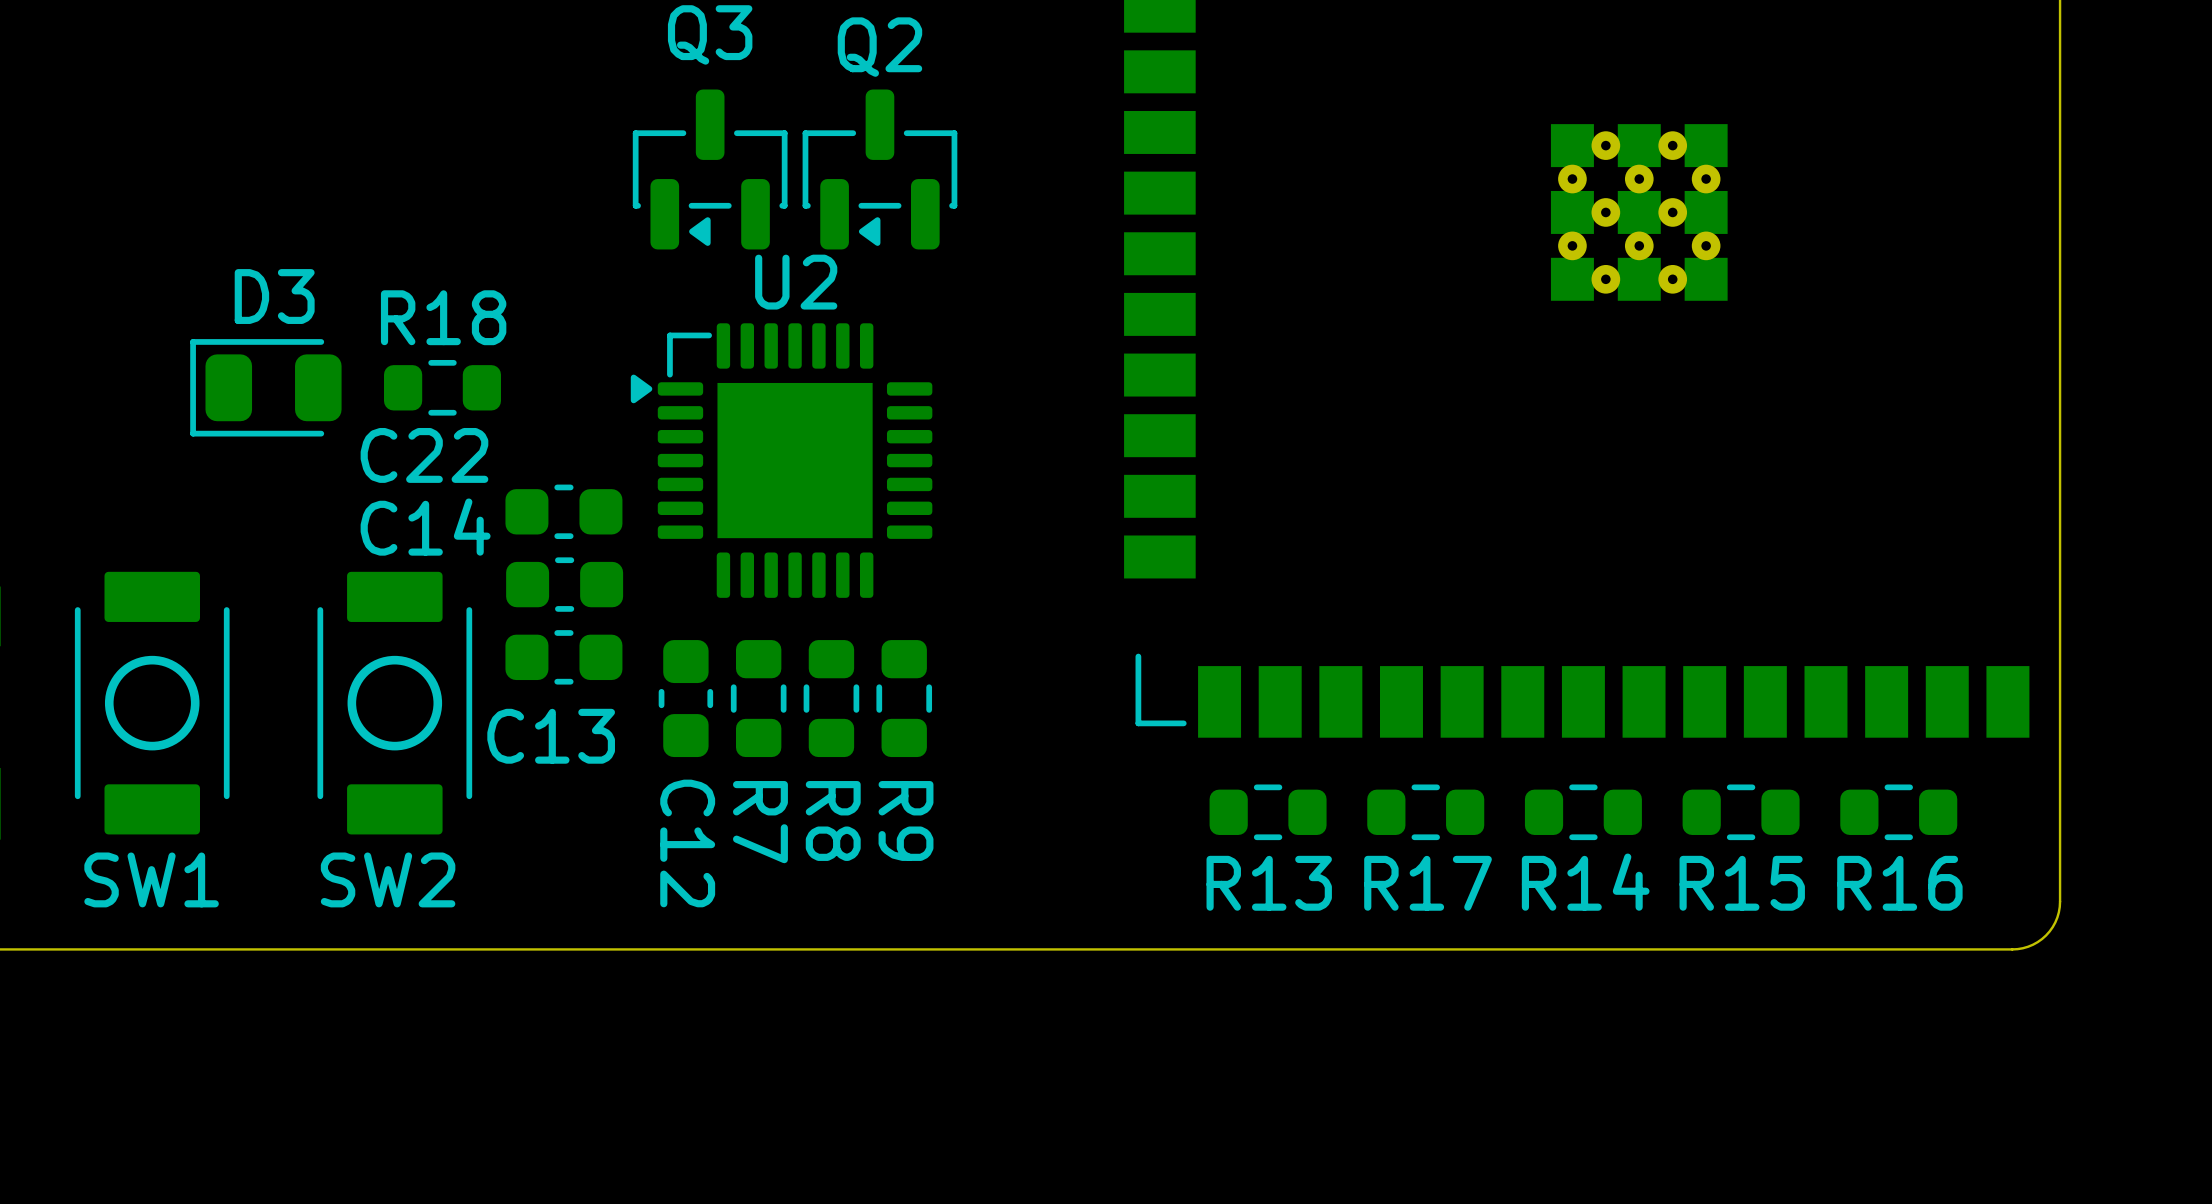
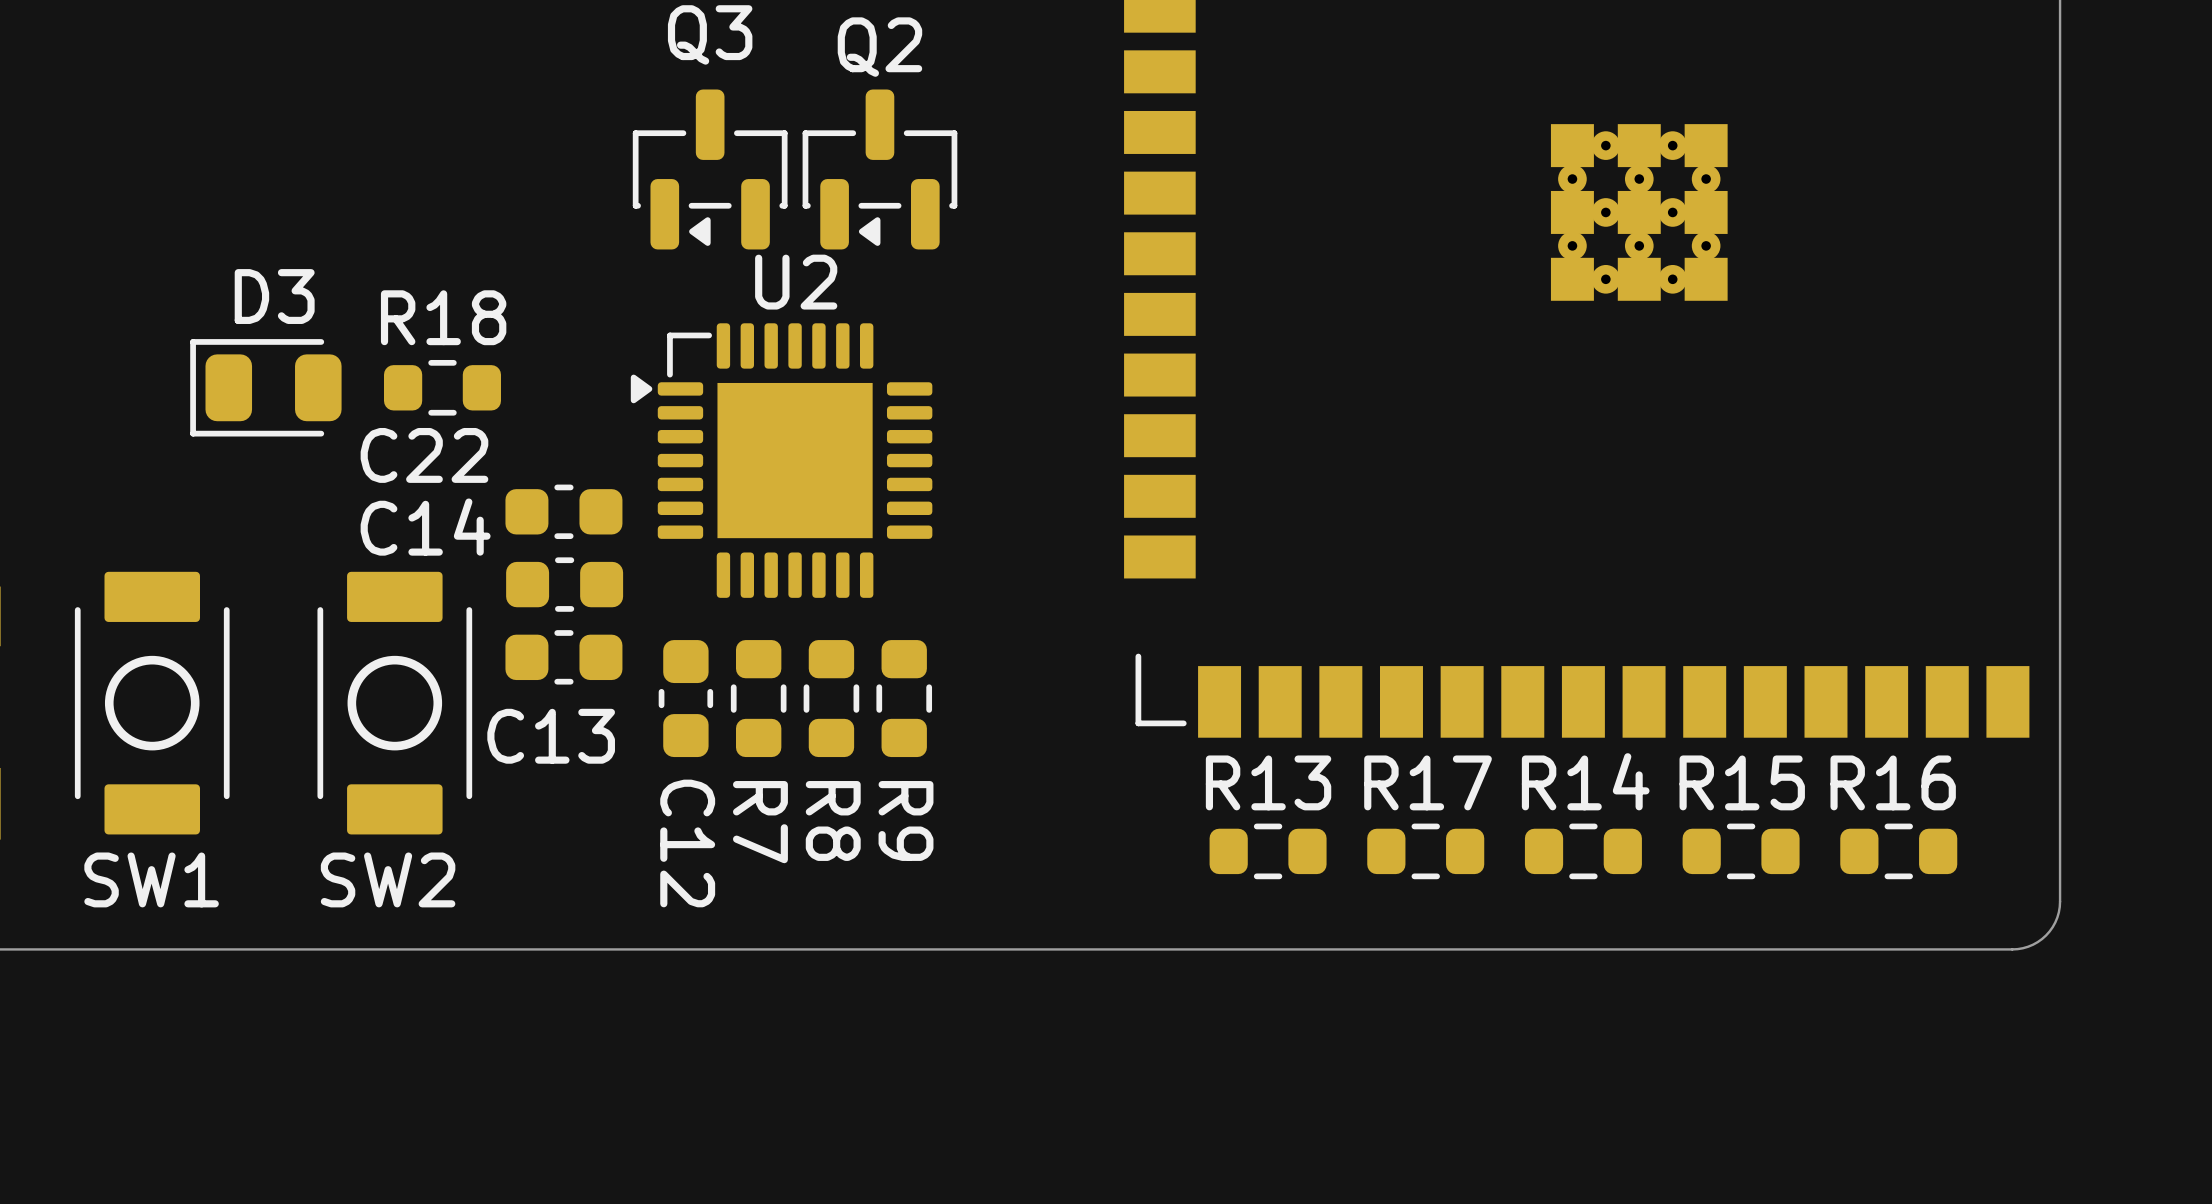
R13 position: (1268, 812) -> (1268, 851)
R17 position: (1425, 812) -> (1425, 851)
R14 position: (1583, 812) -> (1583, 851)
R15 position: (1741, 812) -> (1741, 851)
R16 position: (1898, 812) -> (1898, 851)
R14 name position: R14 (1585, 882) -> R14 (1585, 781)
R13 name position: R13 (1269, 883) -> R13 (1268, 782)
R17 name position: R17 (1428, 883) -> R17 (1428, 782)
R15 name position: R15 (1742, 883) -> R15 (1742, 782)
R16 name position: R16 (1899, 883) -> R16 (1893, 782)

